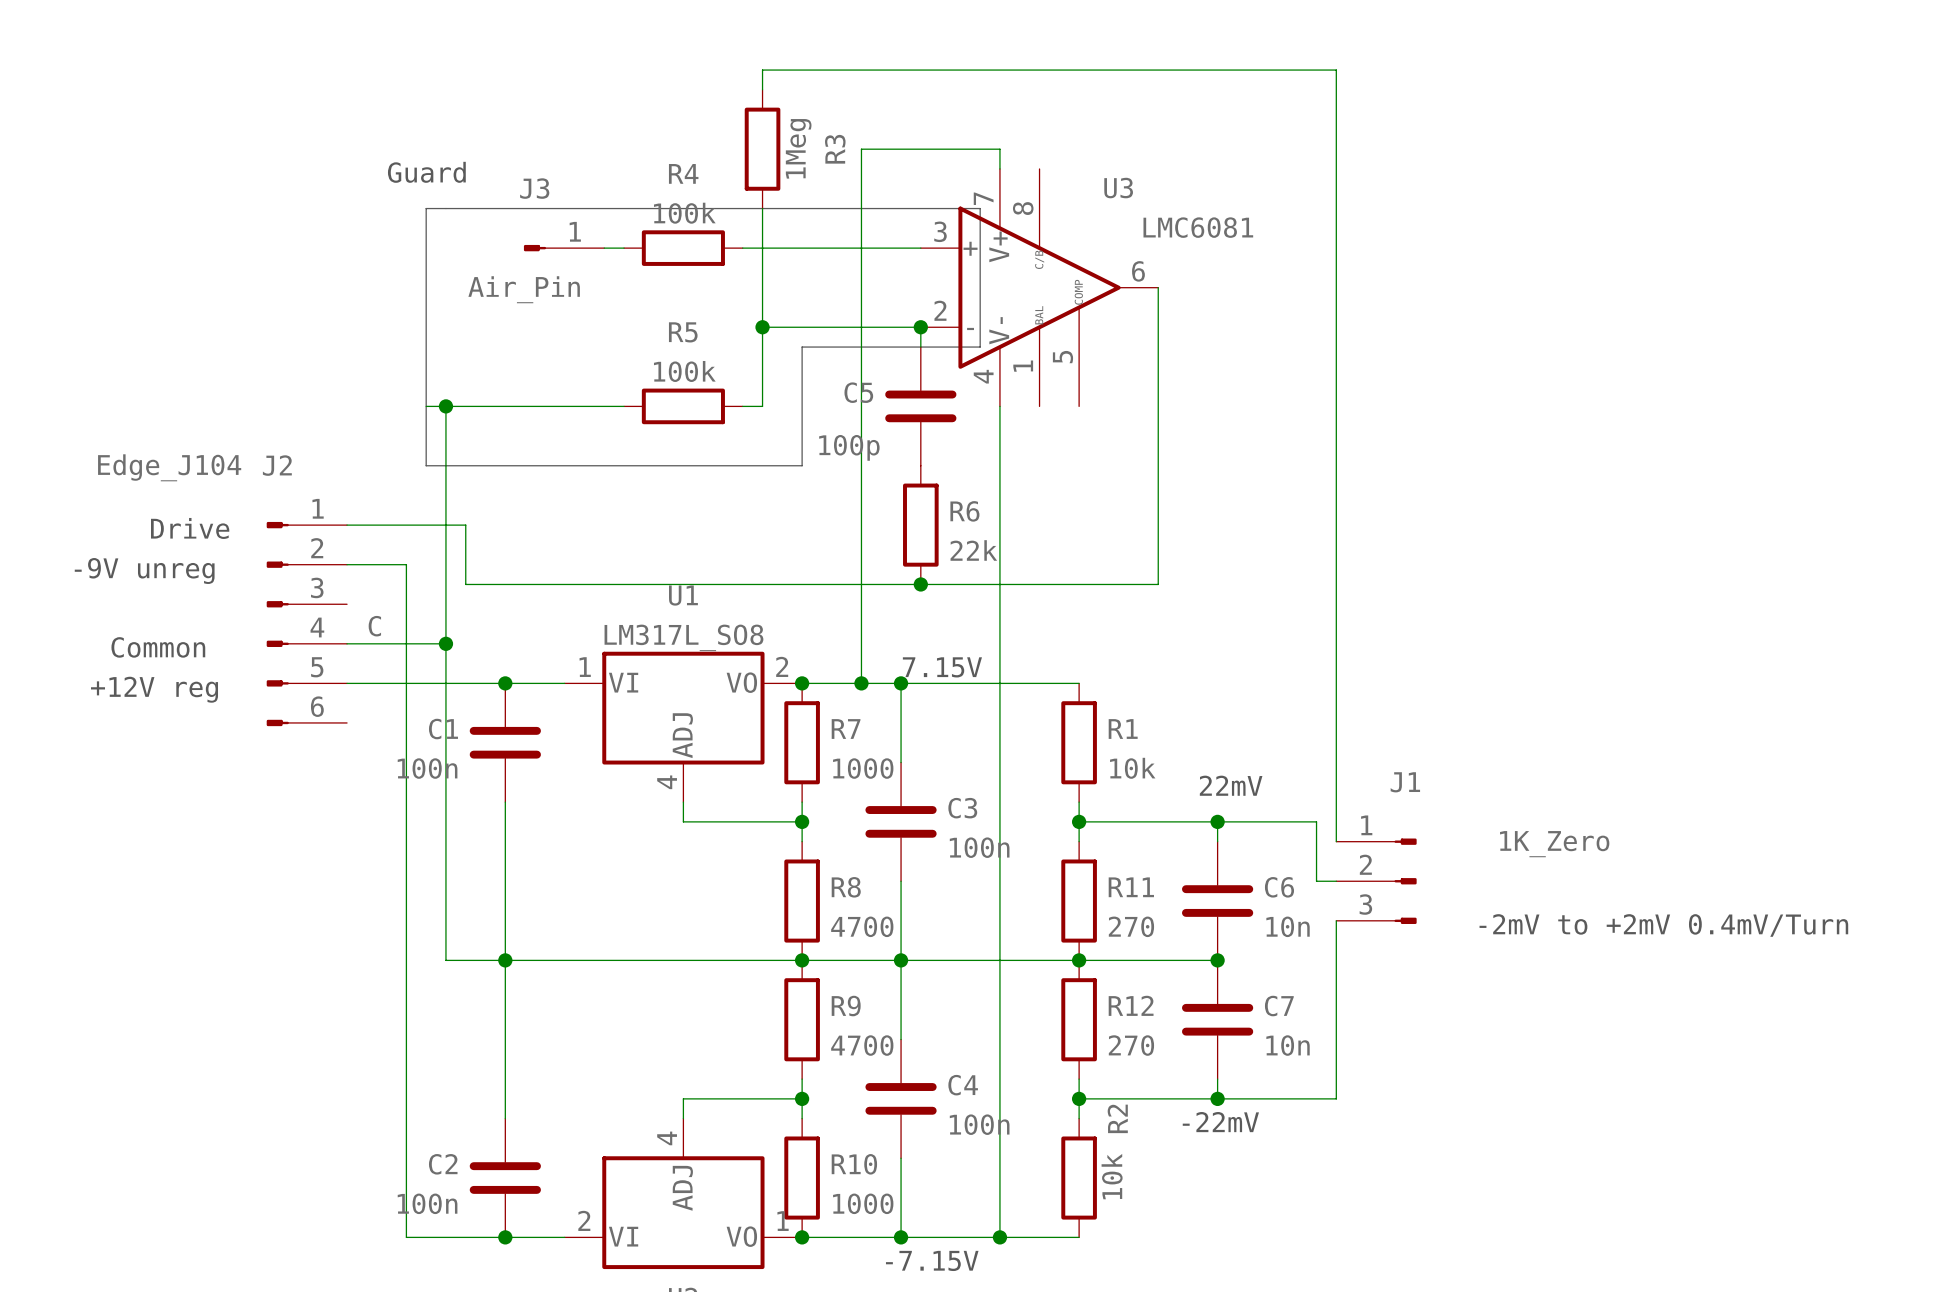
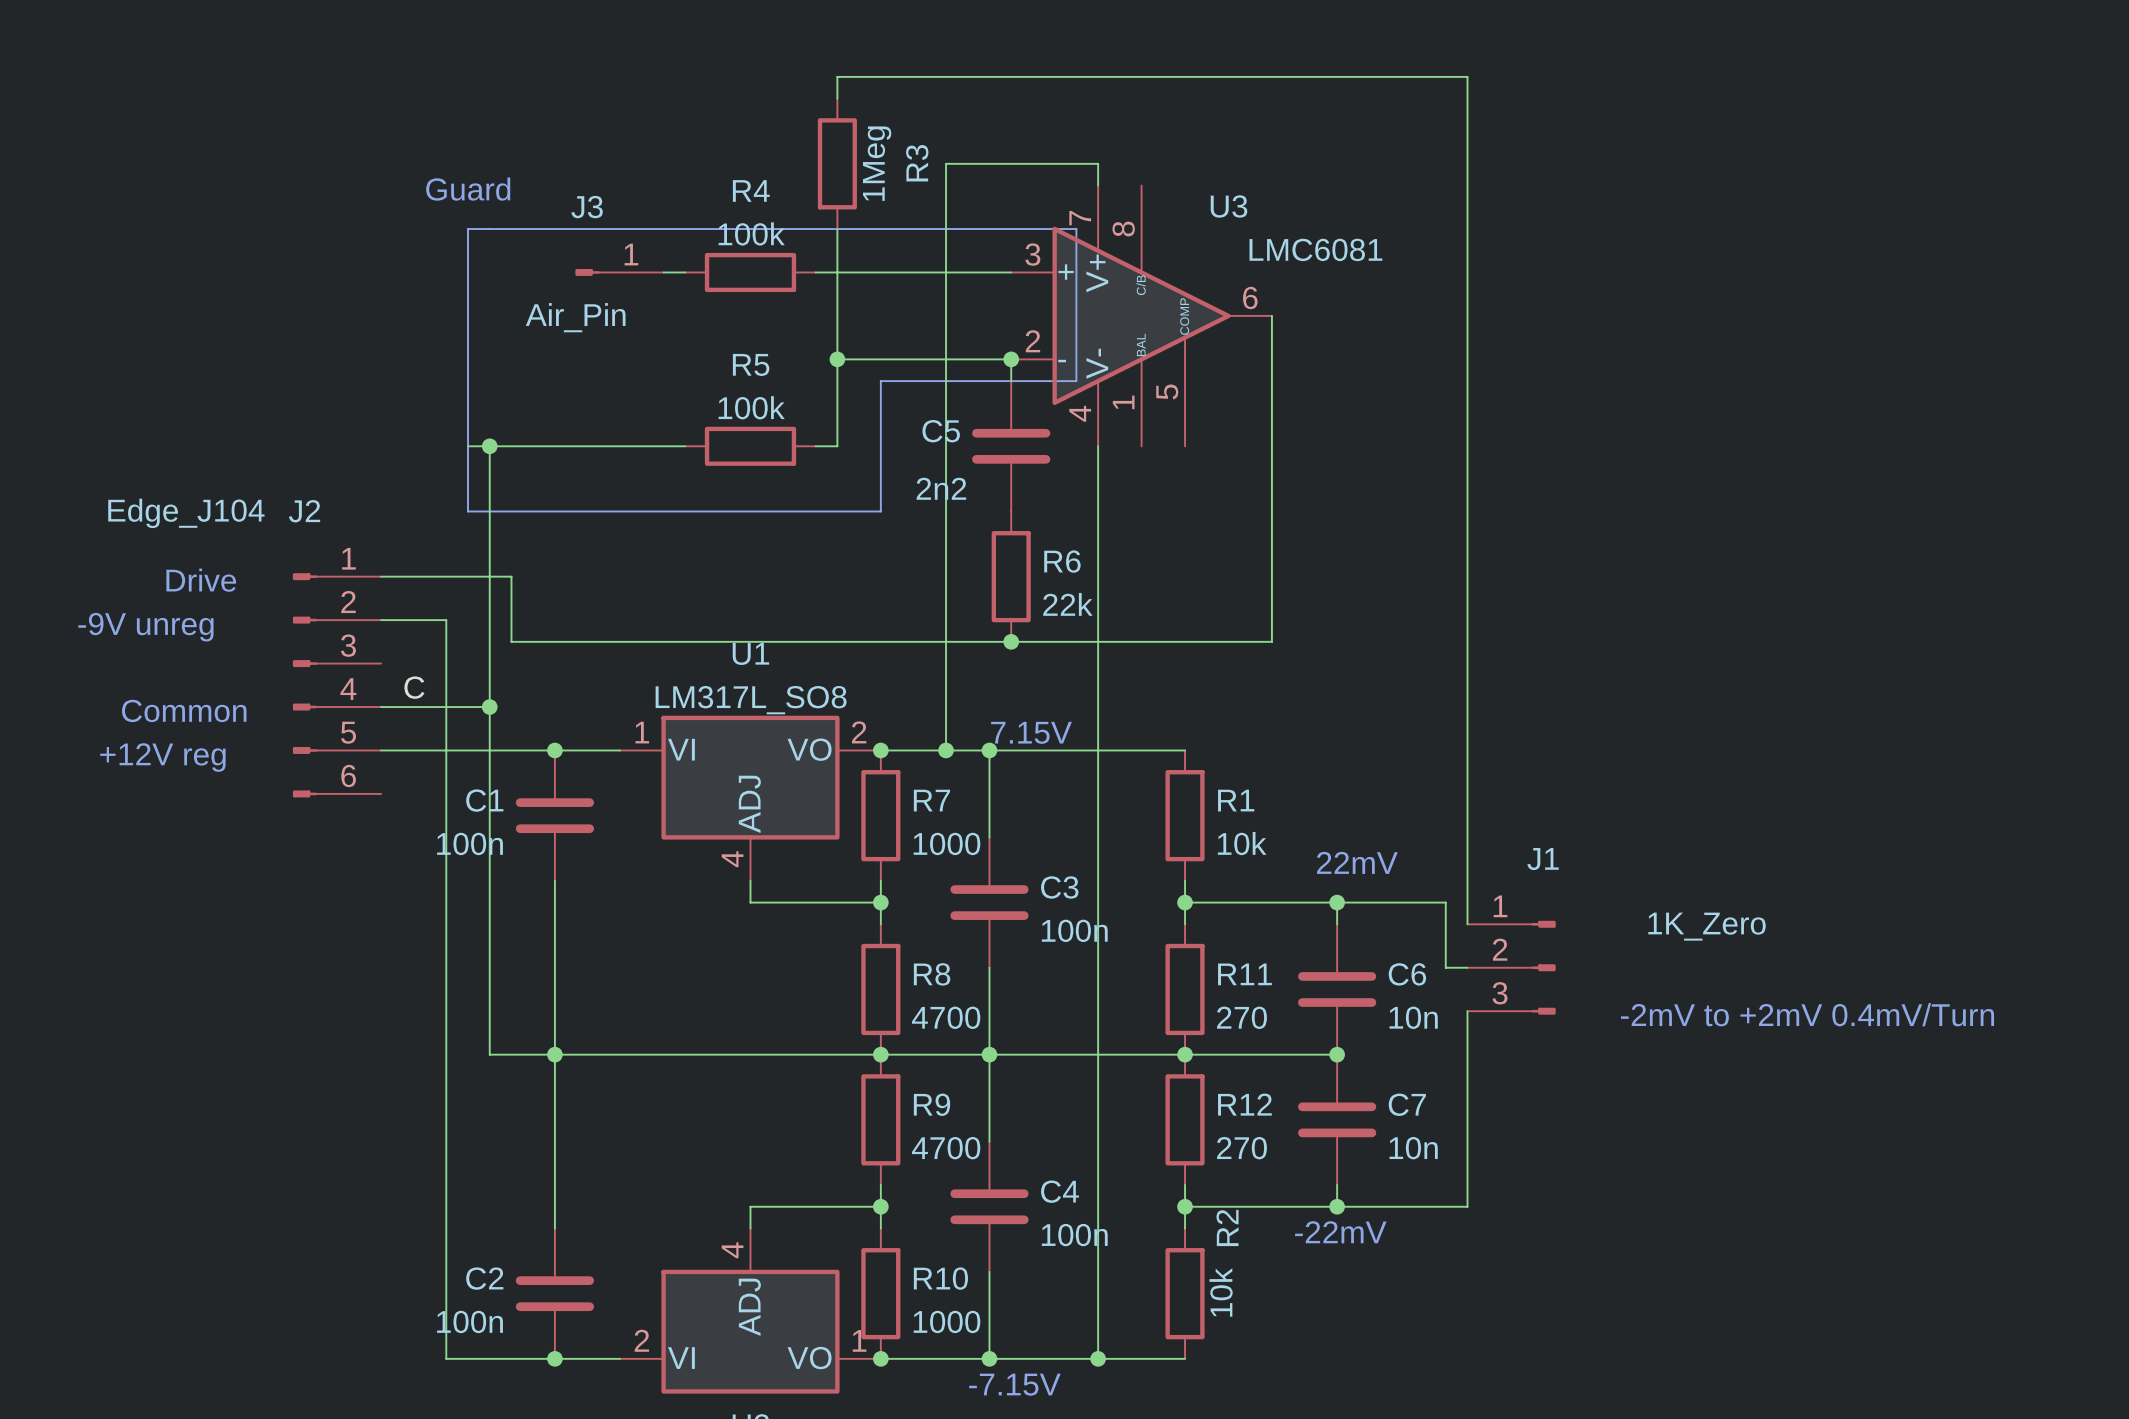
C5 value: 100p (849, 447) -> 2n2 (941, 488)

